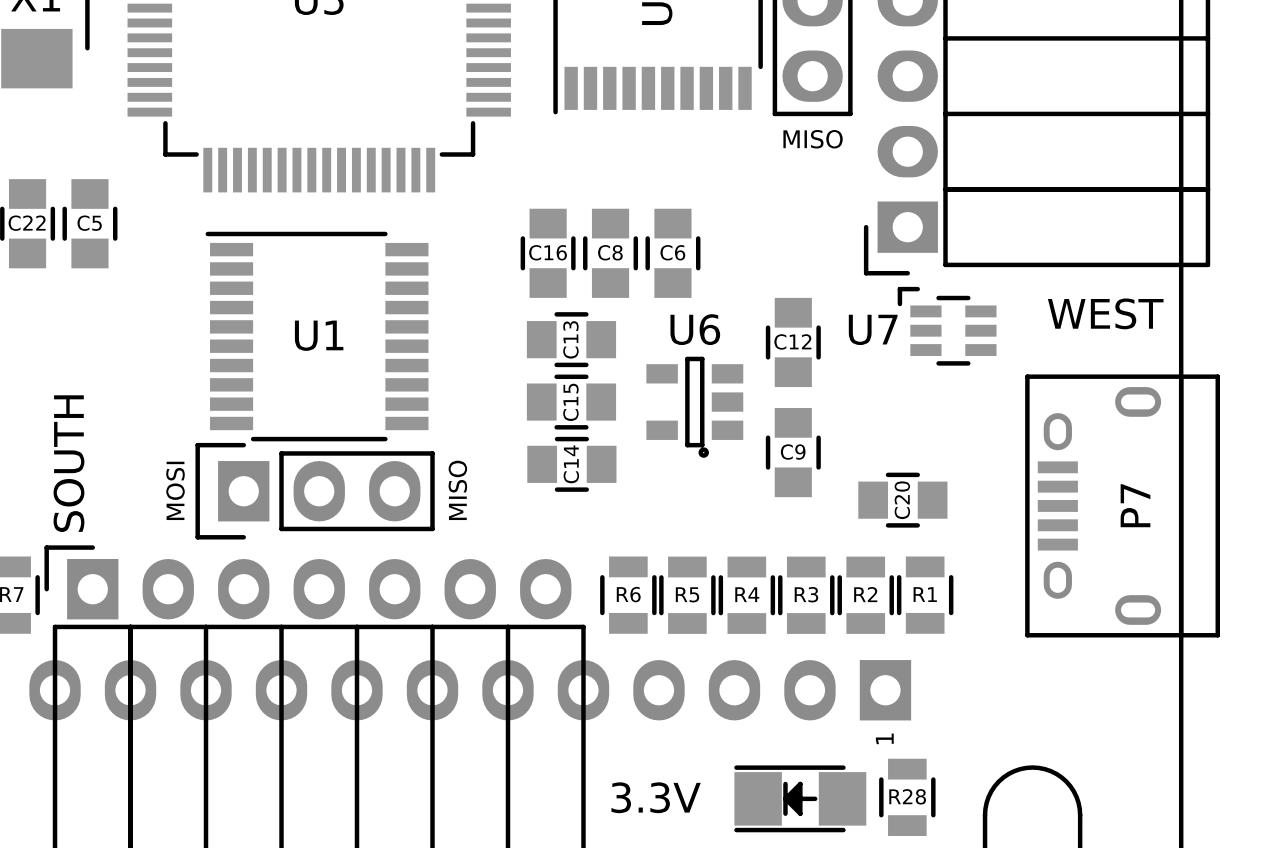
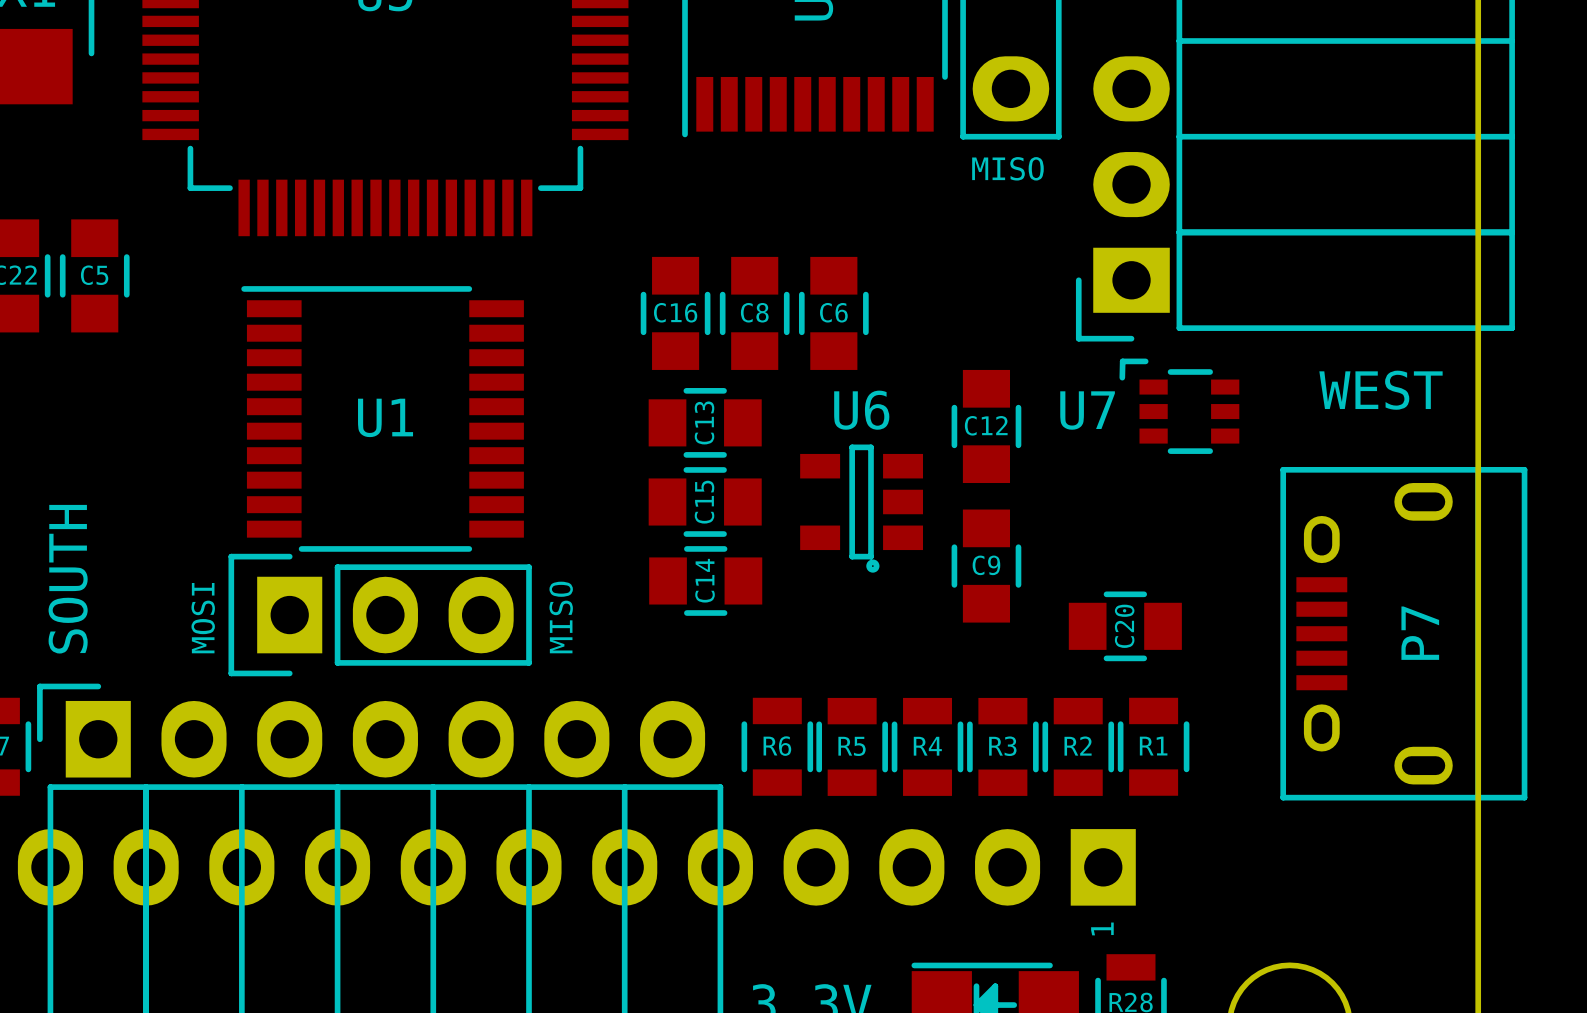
U7 footprint: [897, 286, 997, 366] -> [1119, 358, 1240, 454]

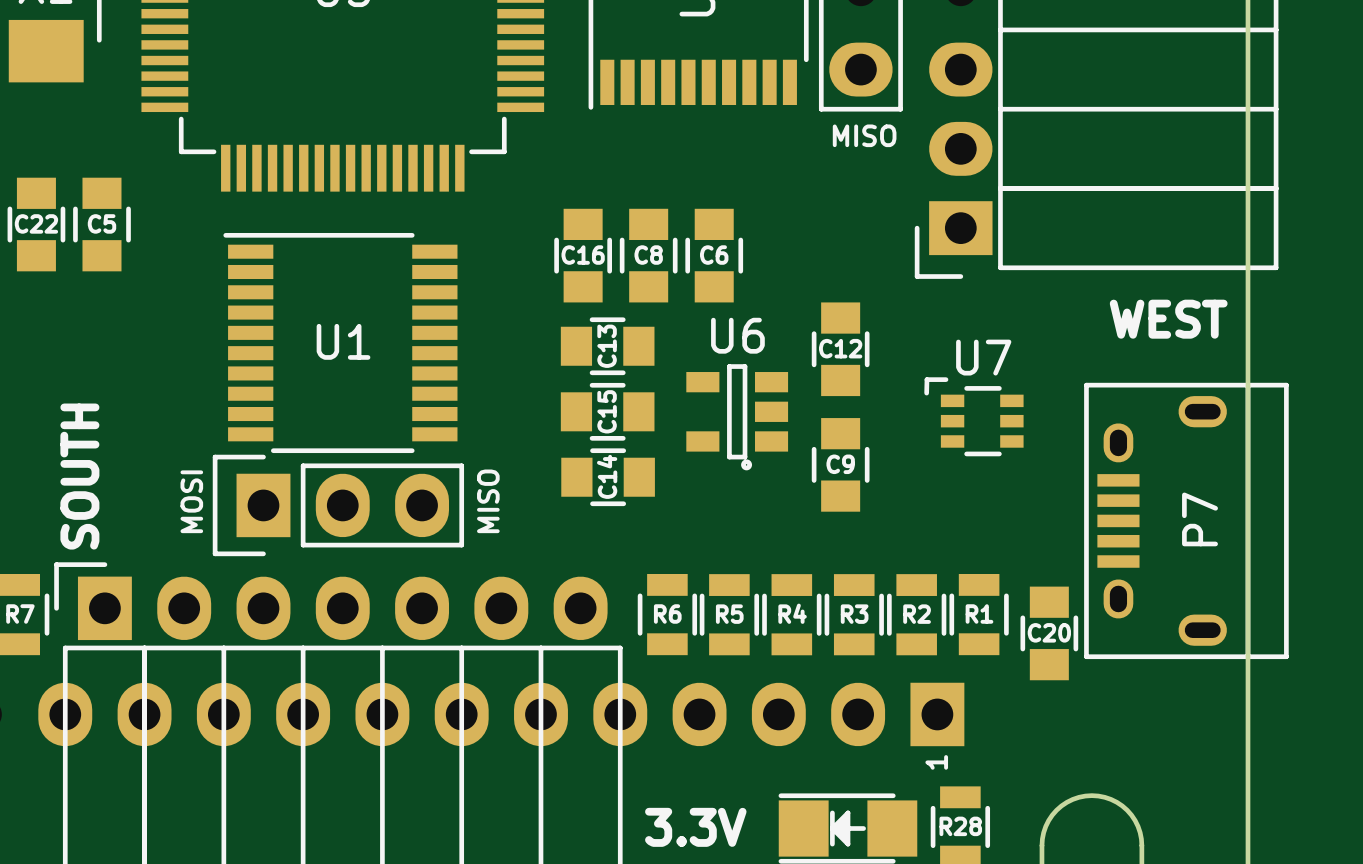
U7 position: (1179, 406) -> (973, 416)
U7 name position: U7 (1087, 410) -> U7 (983, 357)
C20 rotation: 0° (1125, 626) -> 90° clockwise (1049, 633)
C20 position: (1125, 626) -> (1049, 633)

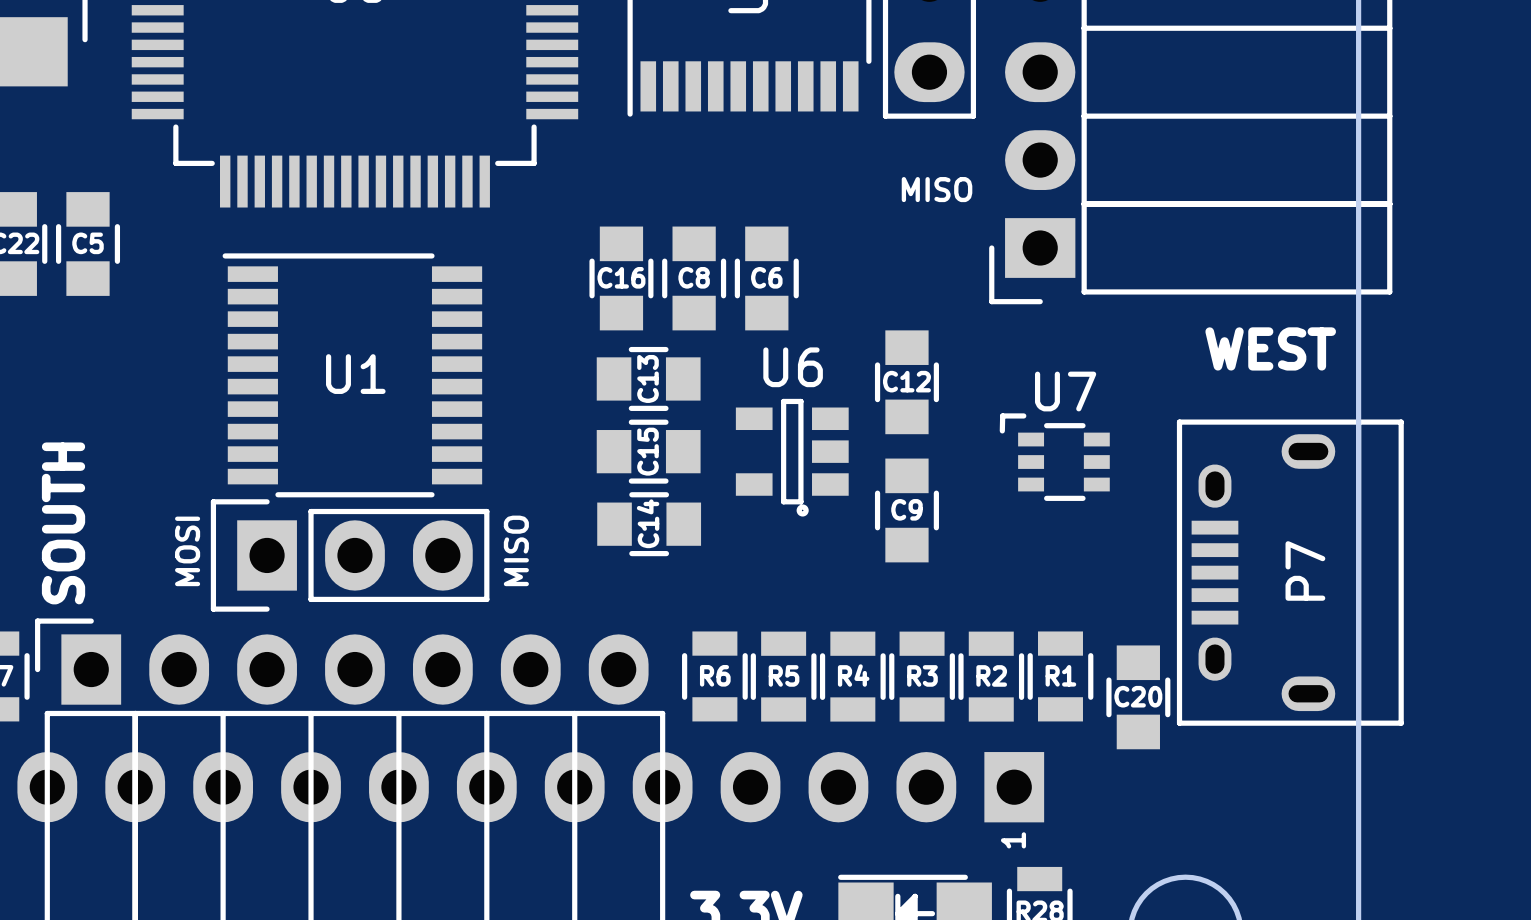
text position: MISO (864, 135) -> MISO (937, 189)

